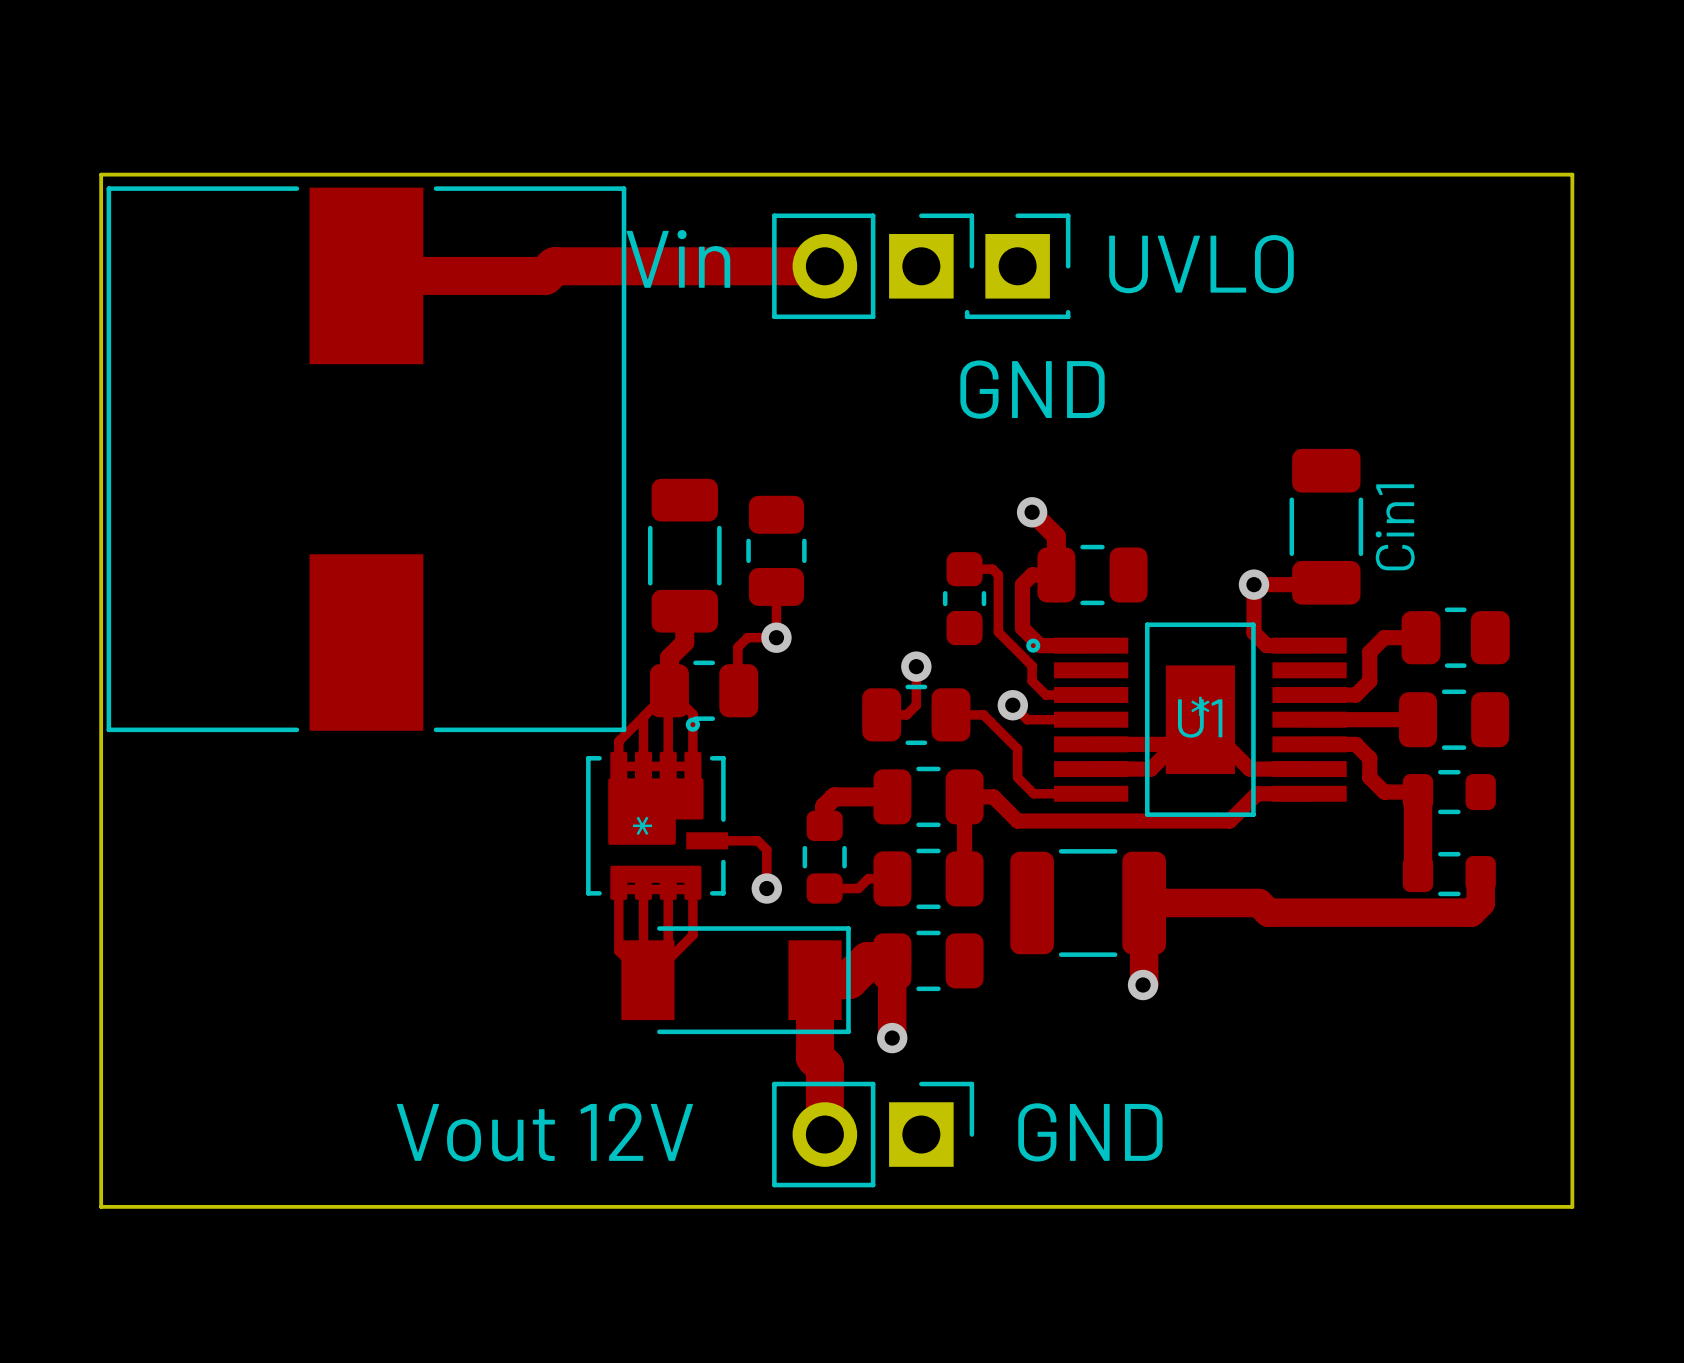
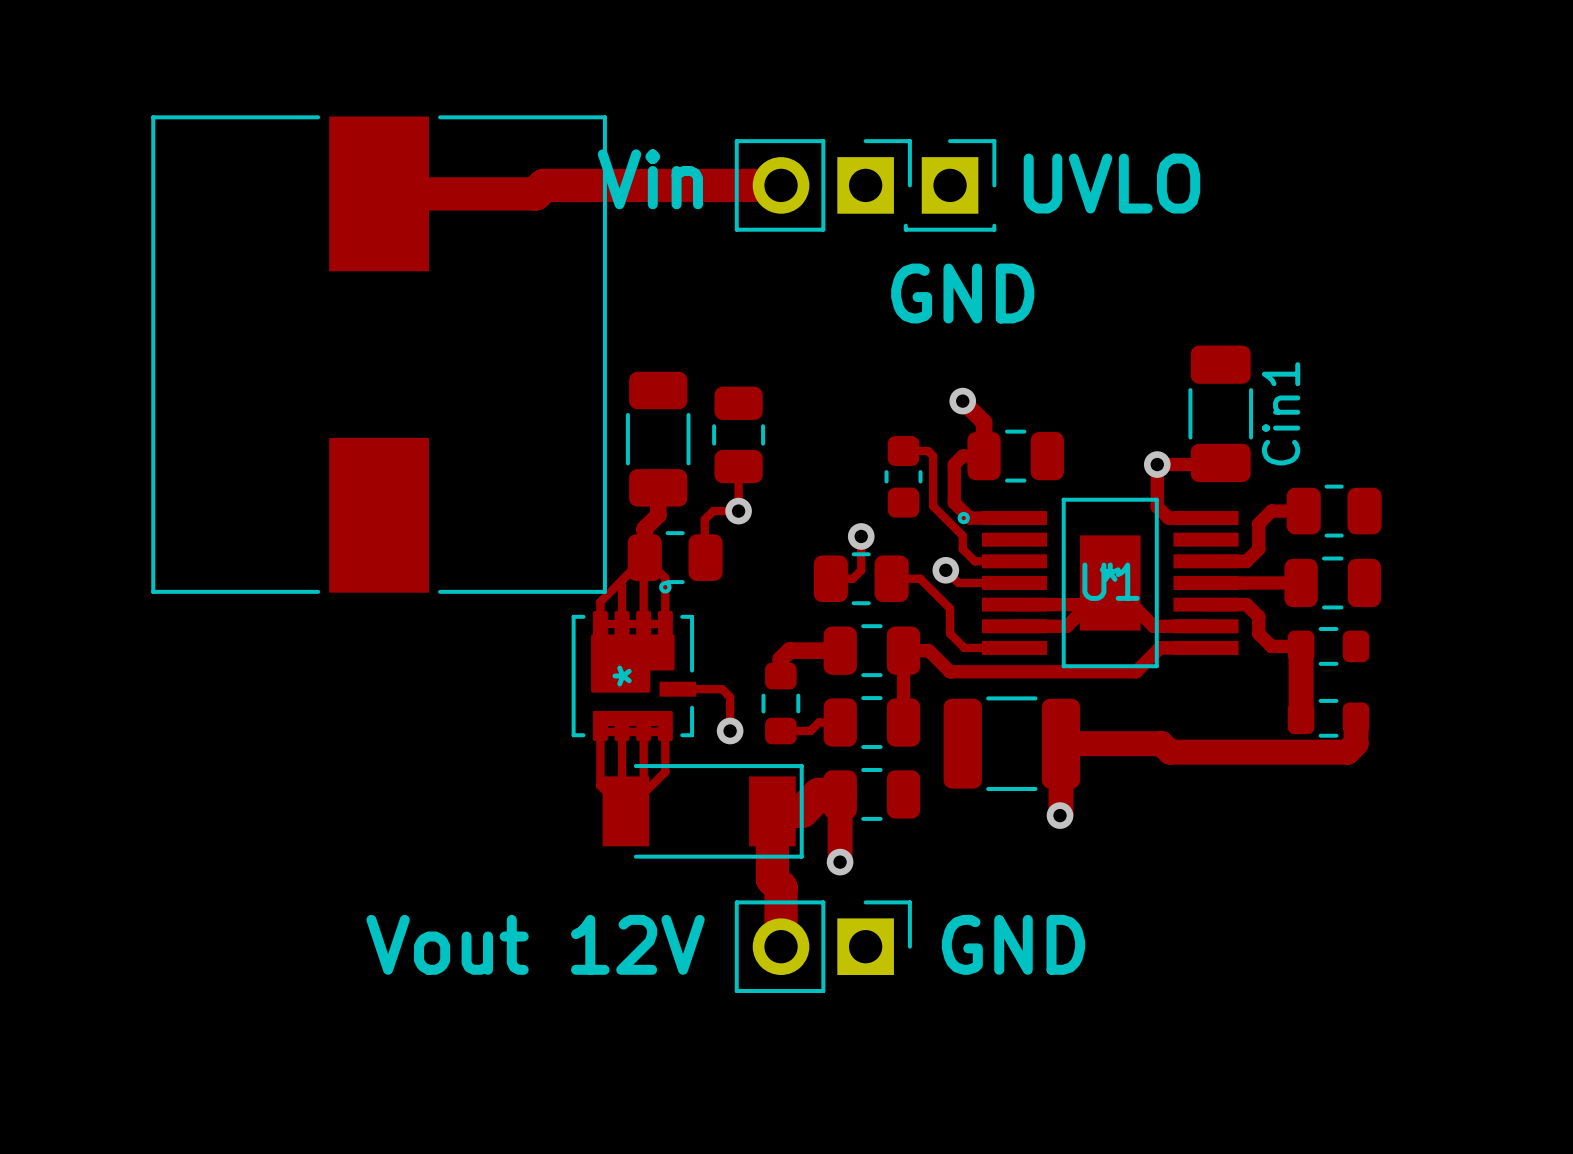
board edge: (101, 174) (1572, 174) (1572, 1206) (101, 1206) (101, 174) -> none

